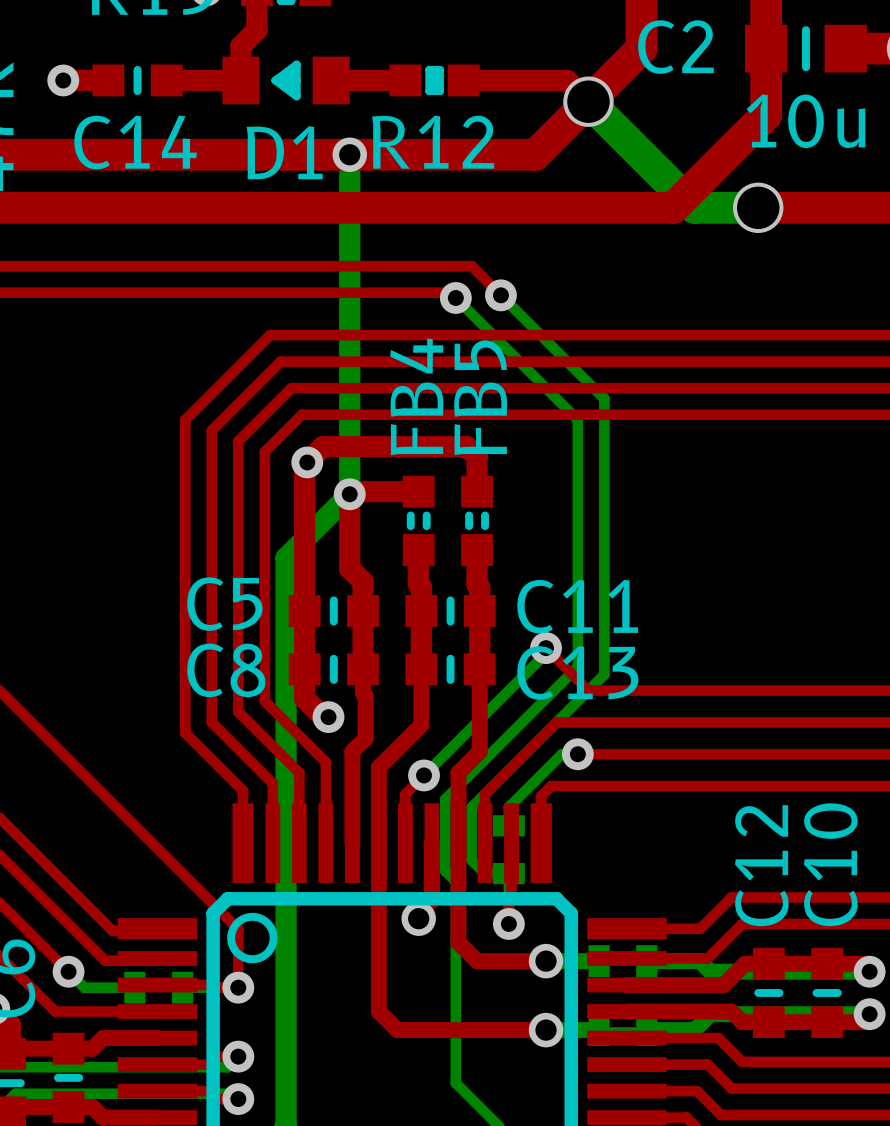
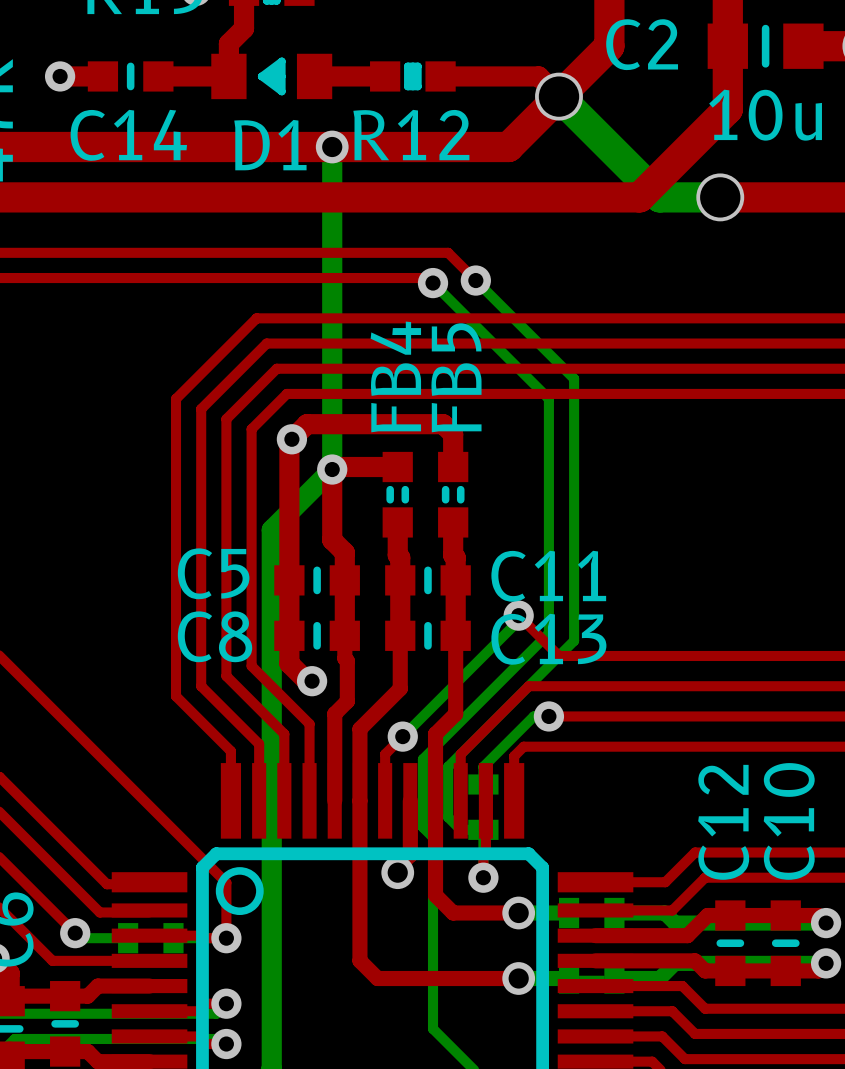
via position: (68, 971) -> (75, 933)

